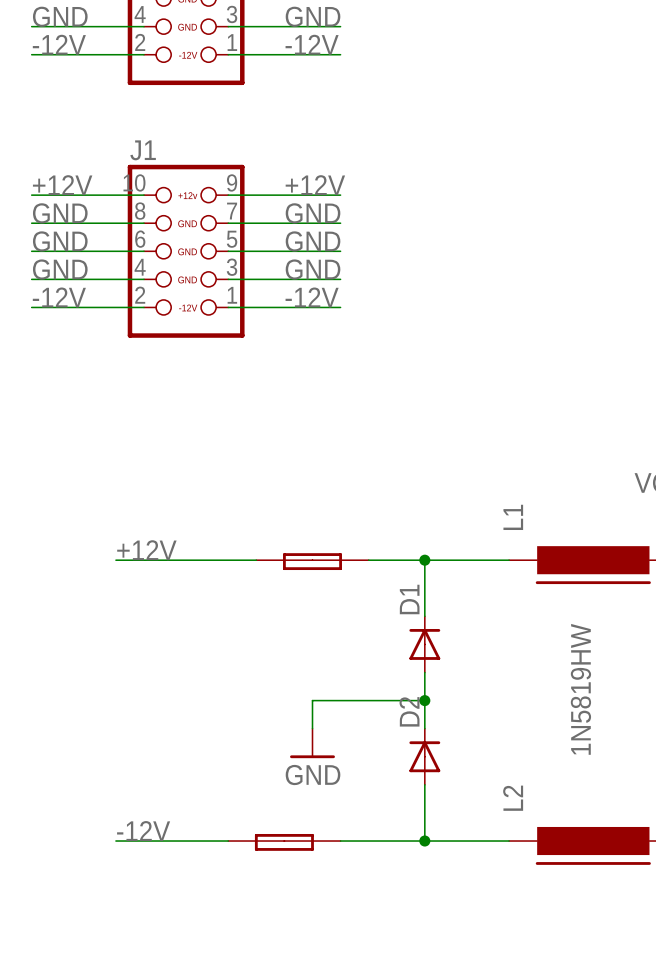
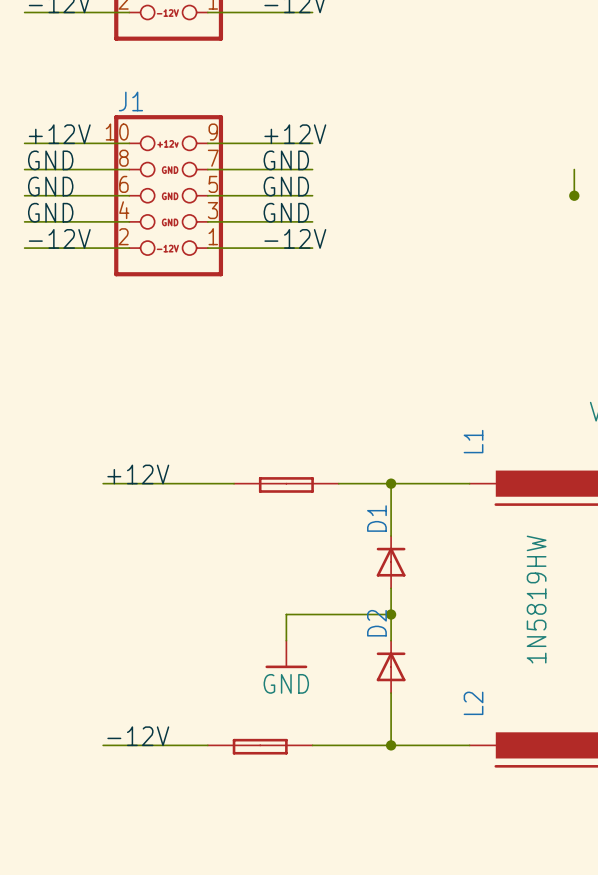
wire: none -> (574, 169) (574, 195)
junction: none -> (574, 195)

